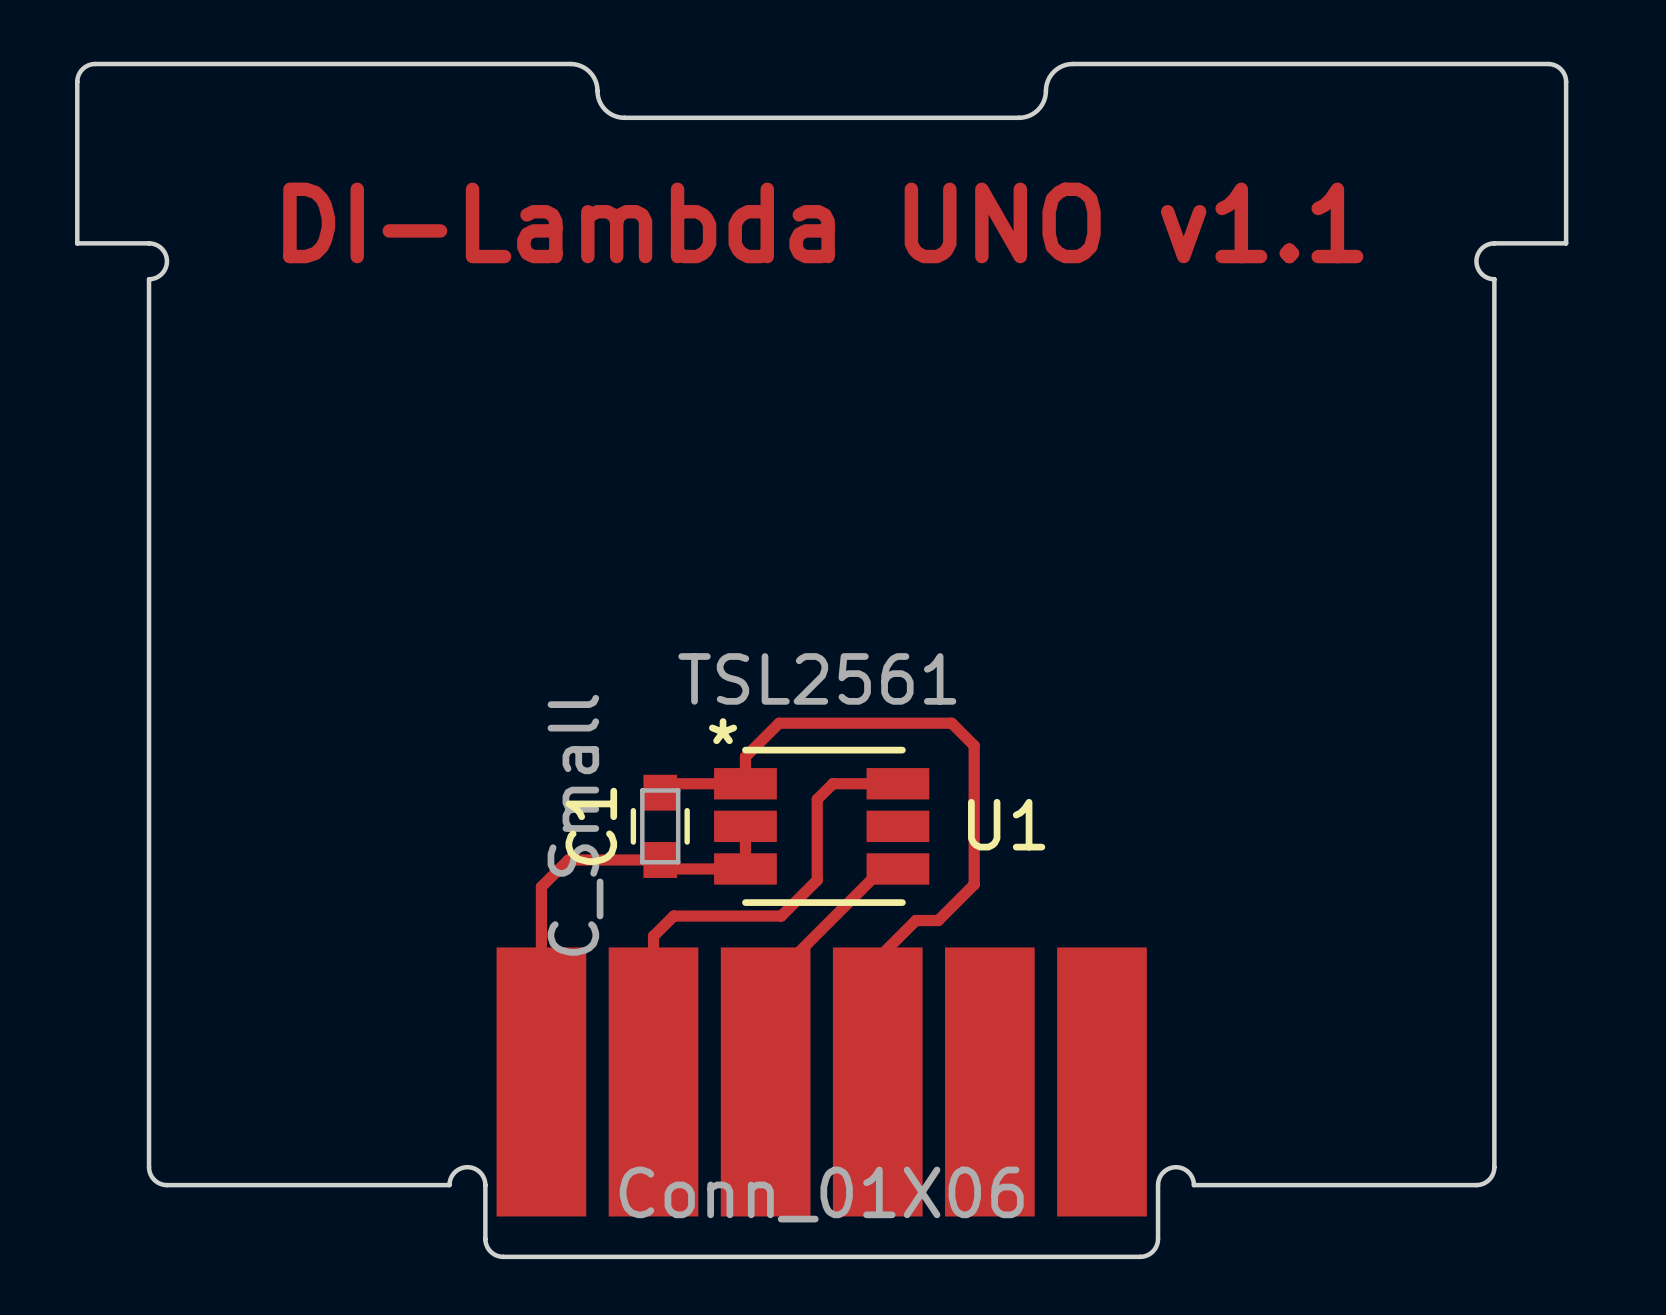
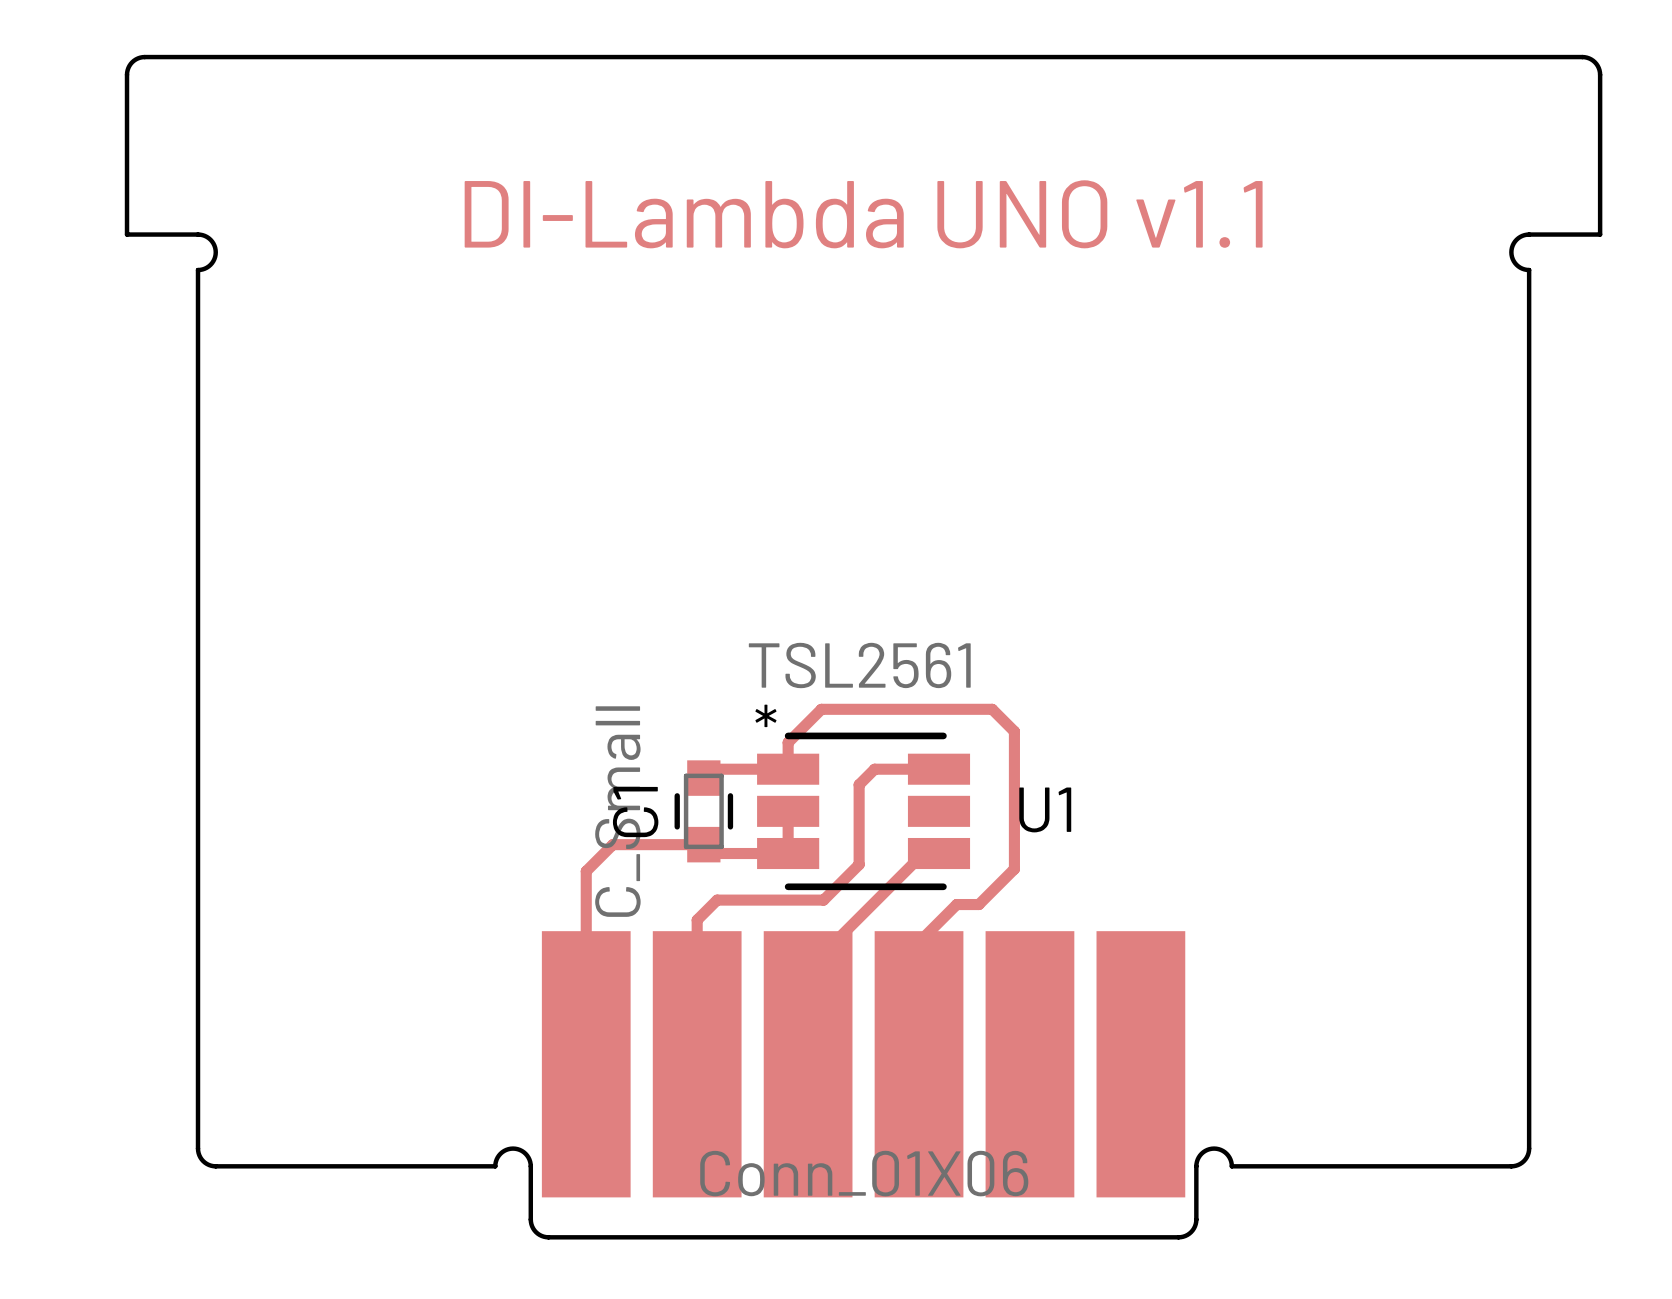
board edge: (570, 63) (580, 66) (591, 74) (596, 83) (599, 101) (605, 109) (614, 115) (624, 117) (1022, 117) (1032, 114) (1040, 107) (1045, 97) (1047, 80) (1053, 71) (1062, 66) (1072, 63) -> (615, 57) (1112, 57)

